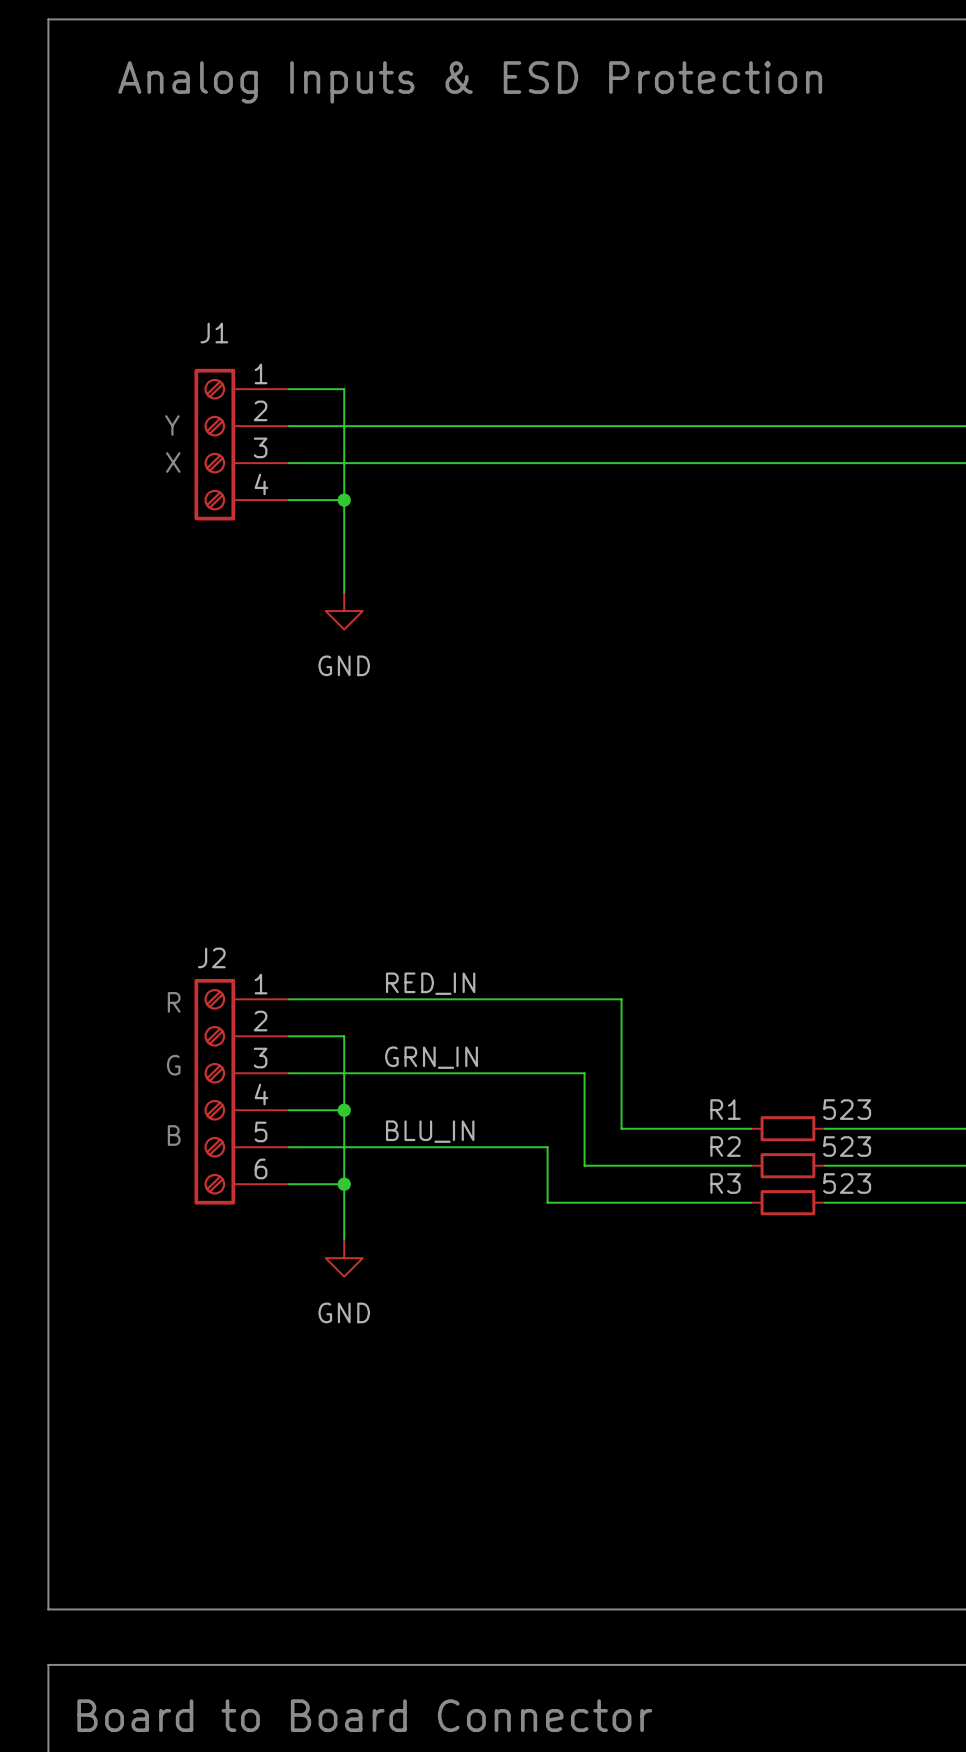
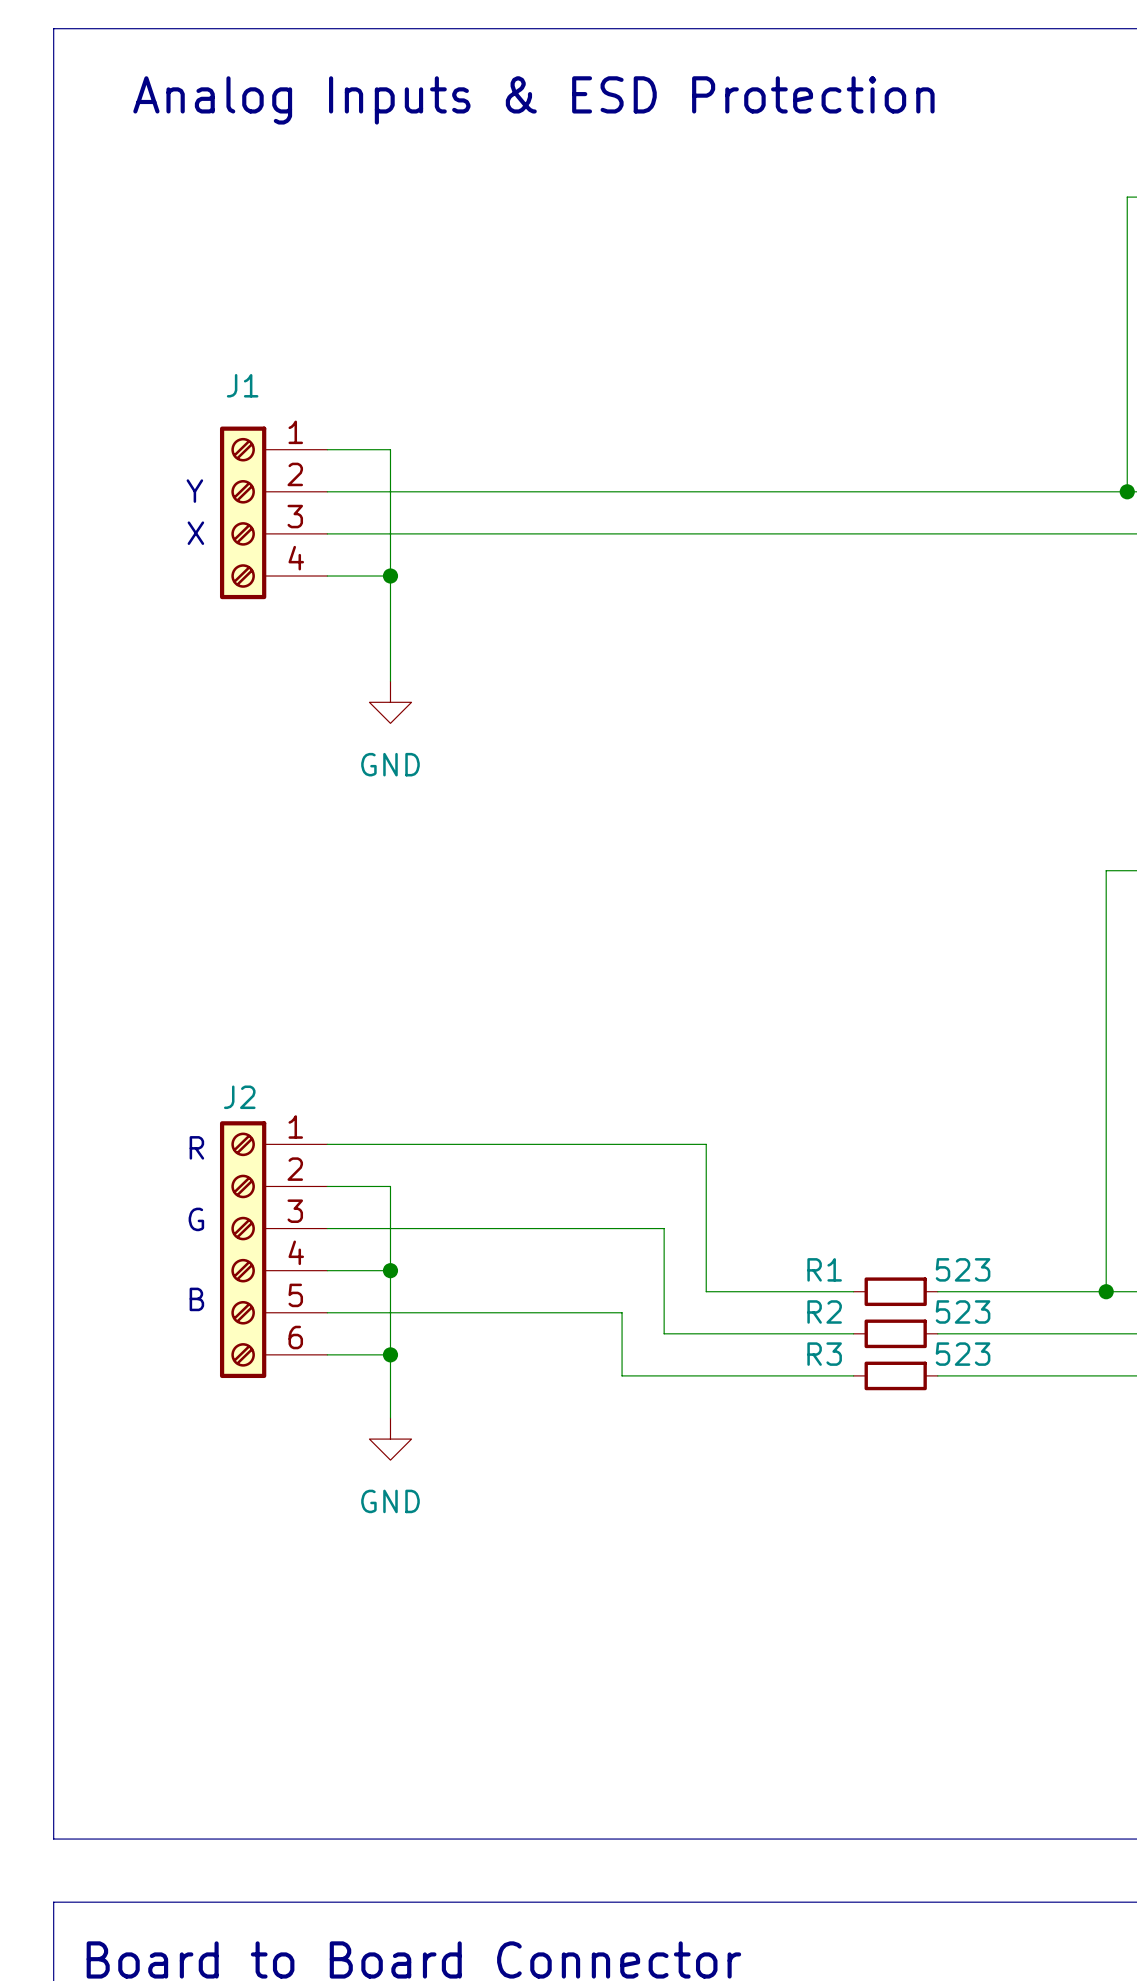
label: RED_IN (430, 983) -> none
label: GRN_IN (431, 1057) -> none
label: BLU_IN (430, 1131) -> none

